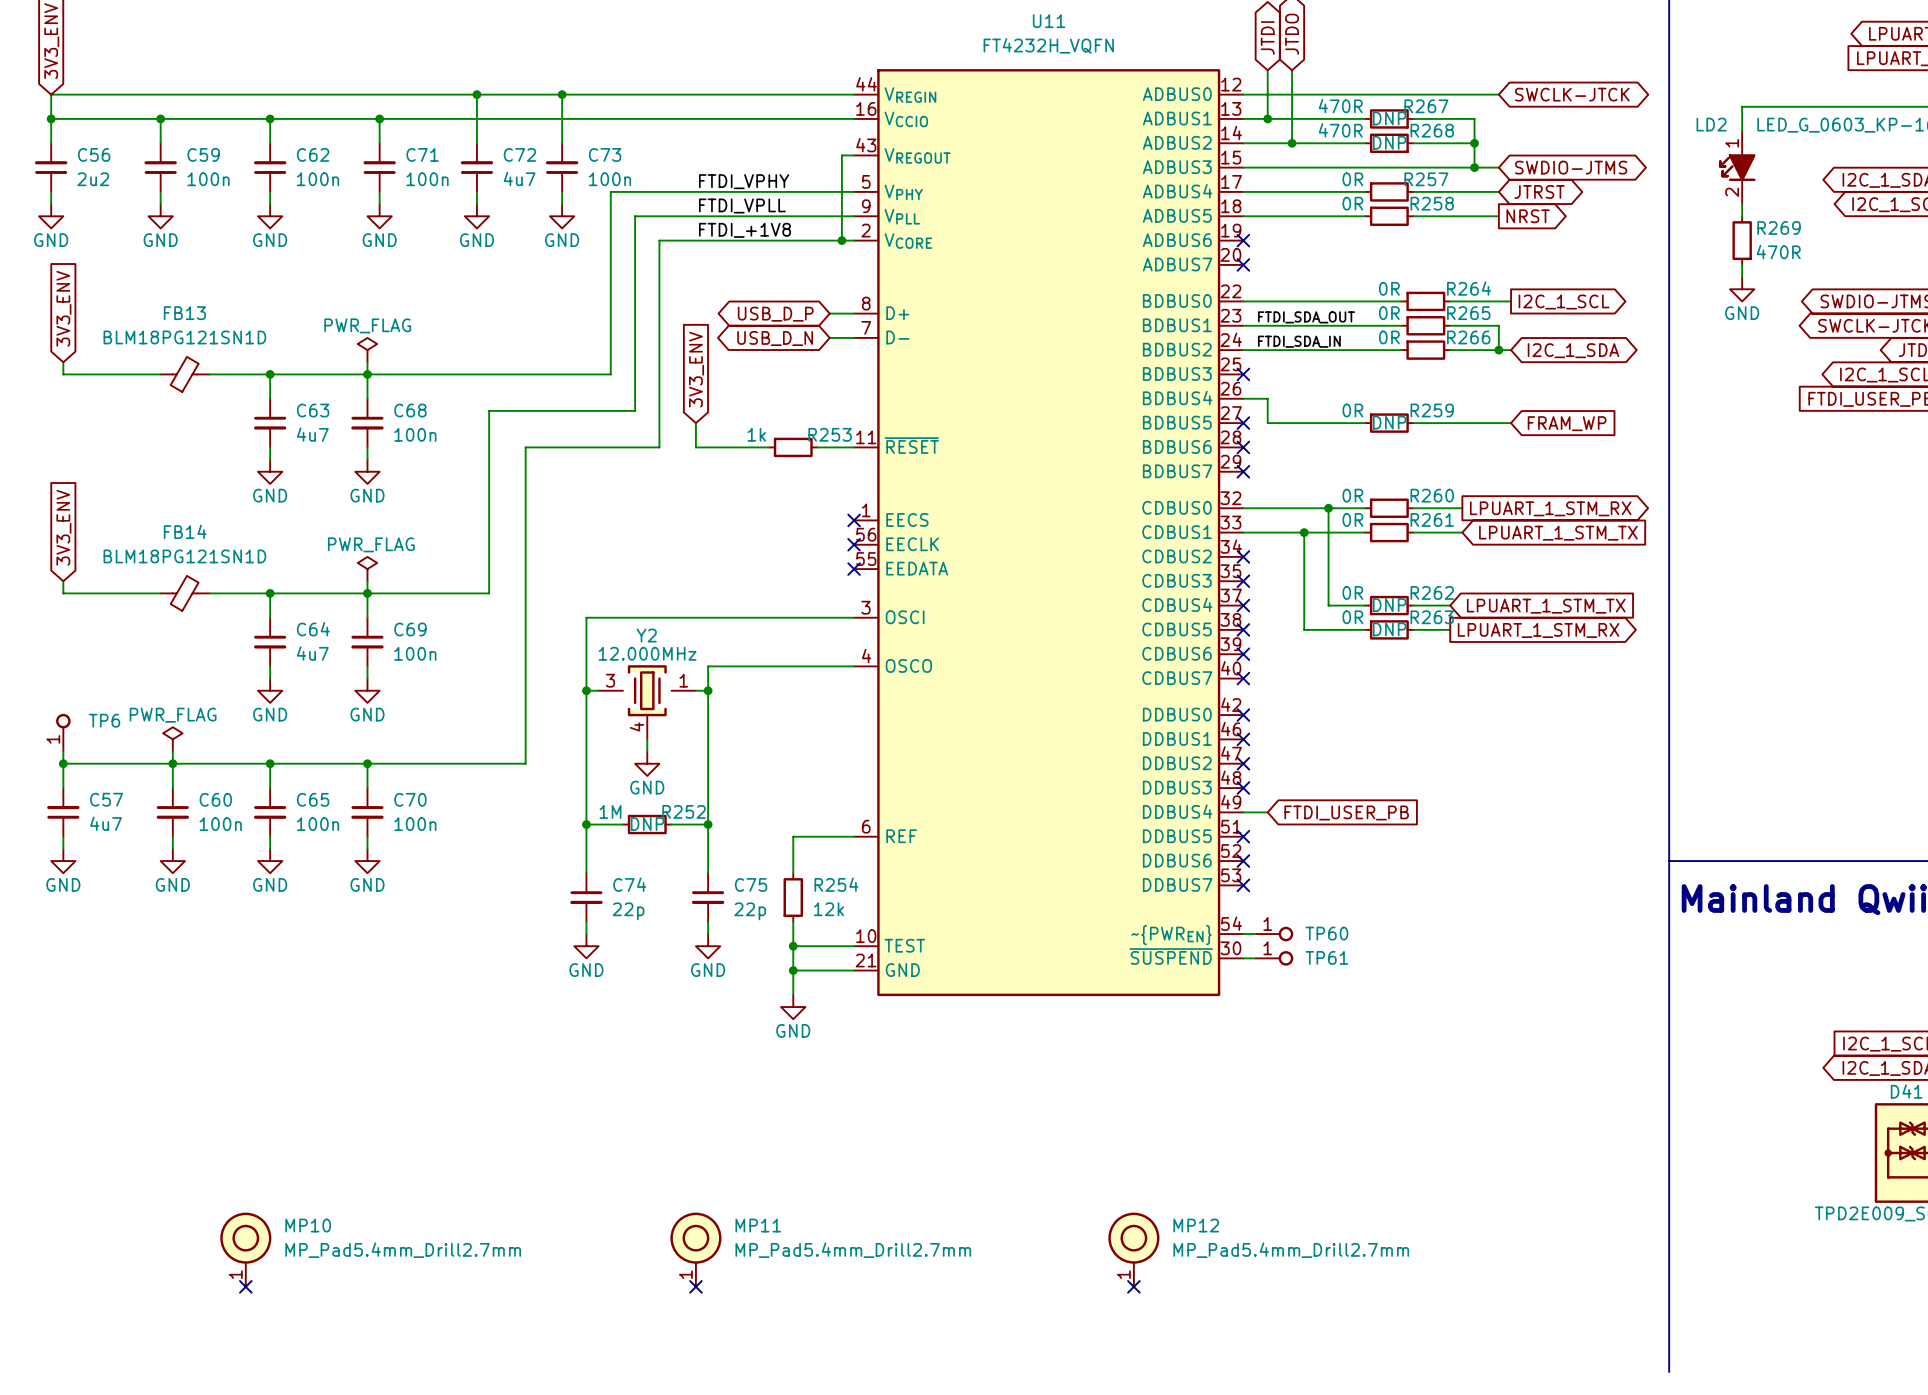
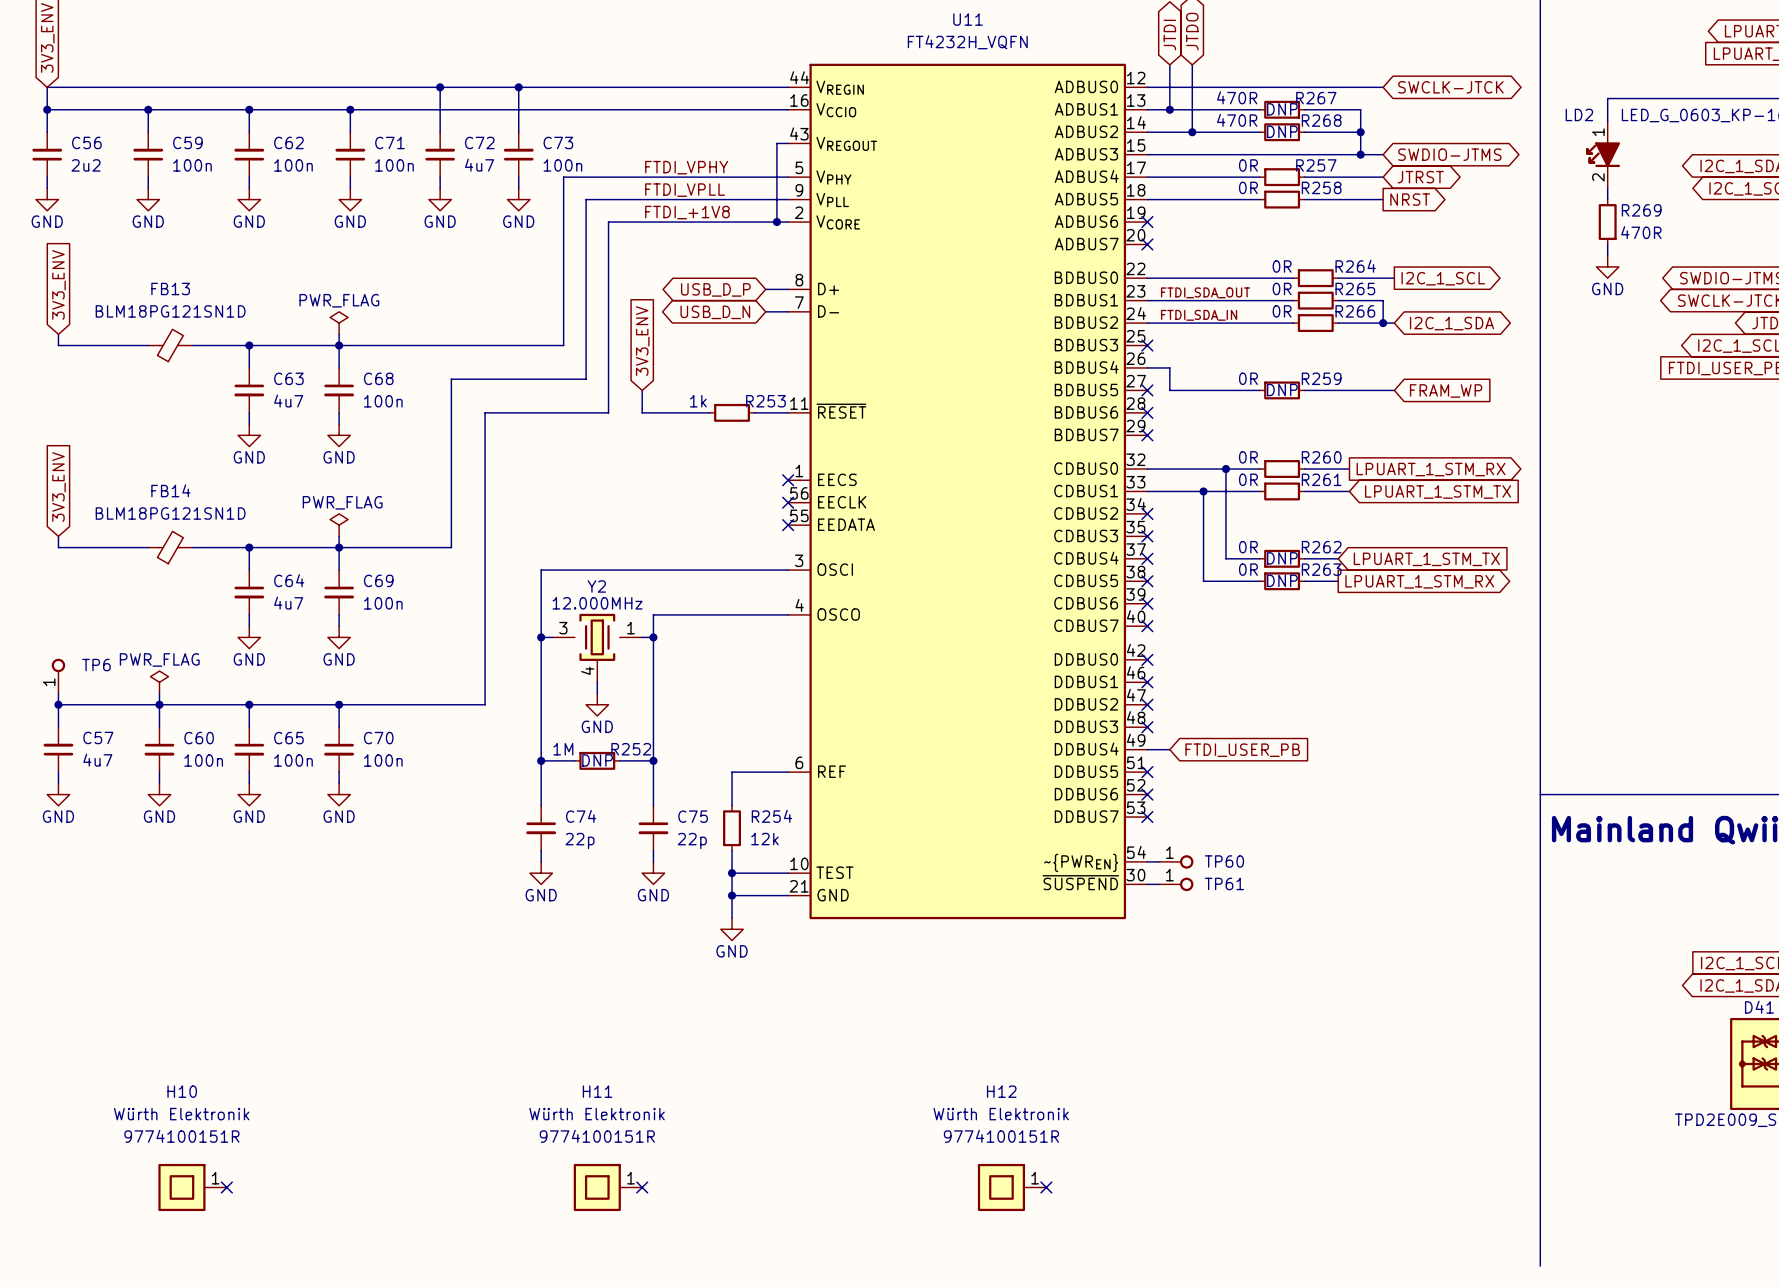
MP10: MP_Pad5.4mm_Drill2.7mm (245, 1249) -> none
MP11: MP_Pad5.4mm_Drill2.7mm (695, 1249) -> none
MP12: MP_Pad5.4mm_Drill2.7mm (1133, 1249) -> none
H10: none -> (192, 1187)
H11: none -> (607, 1187)
H12: none -> (1012, 1187)

